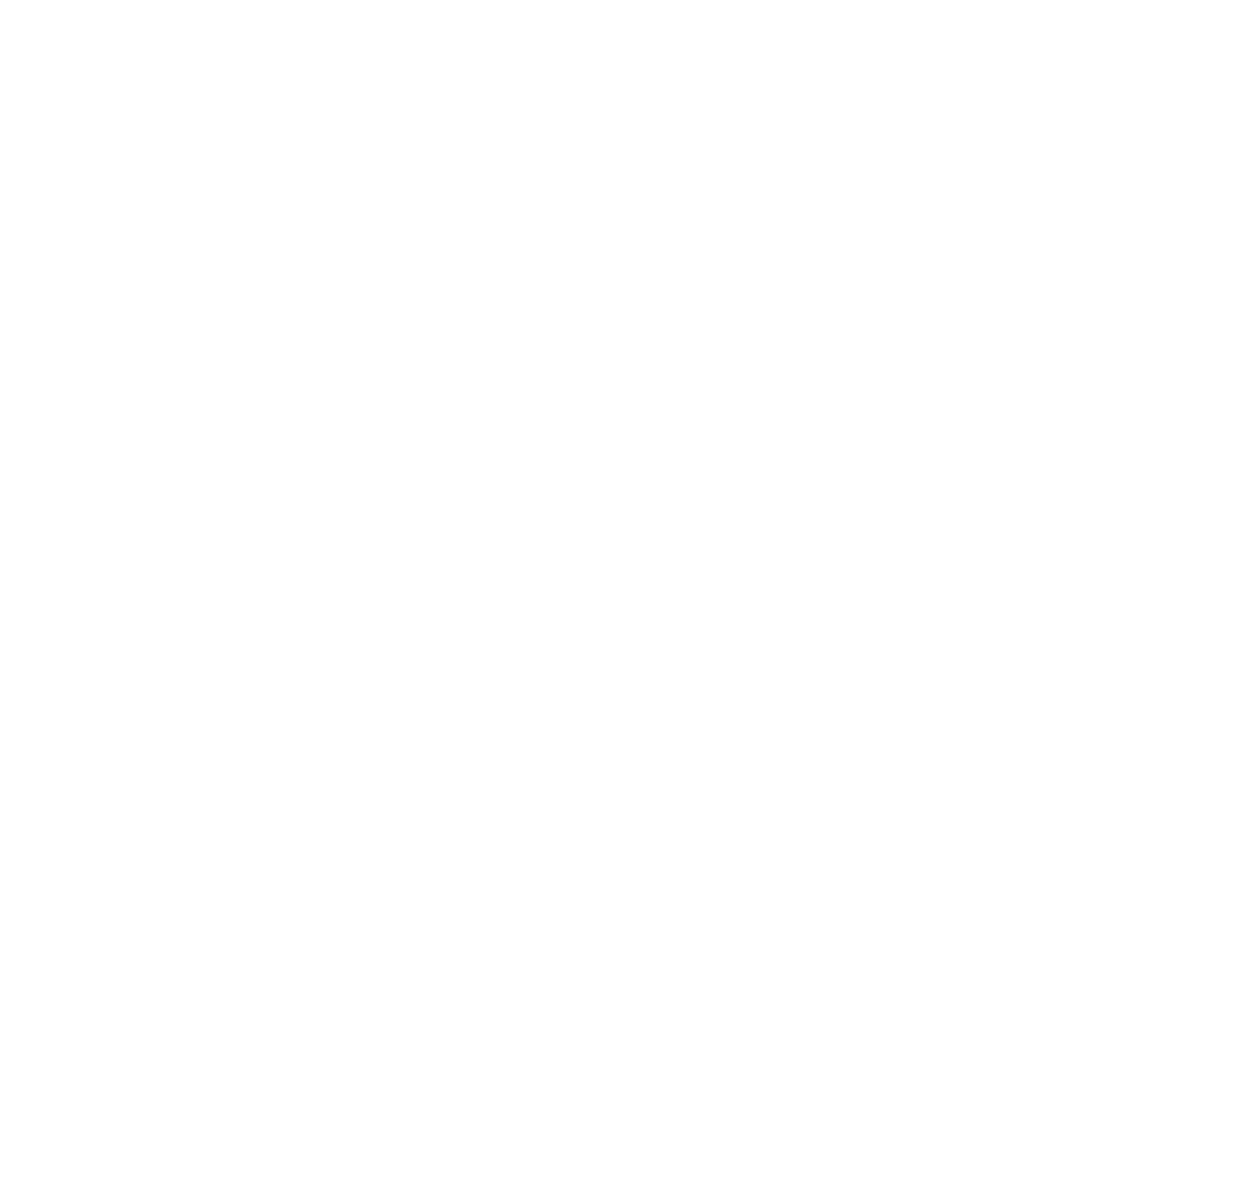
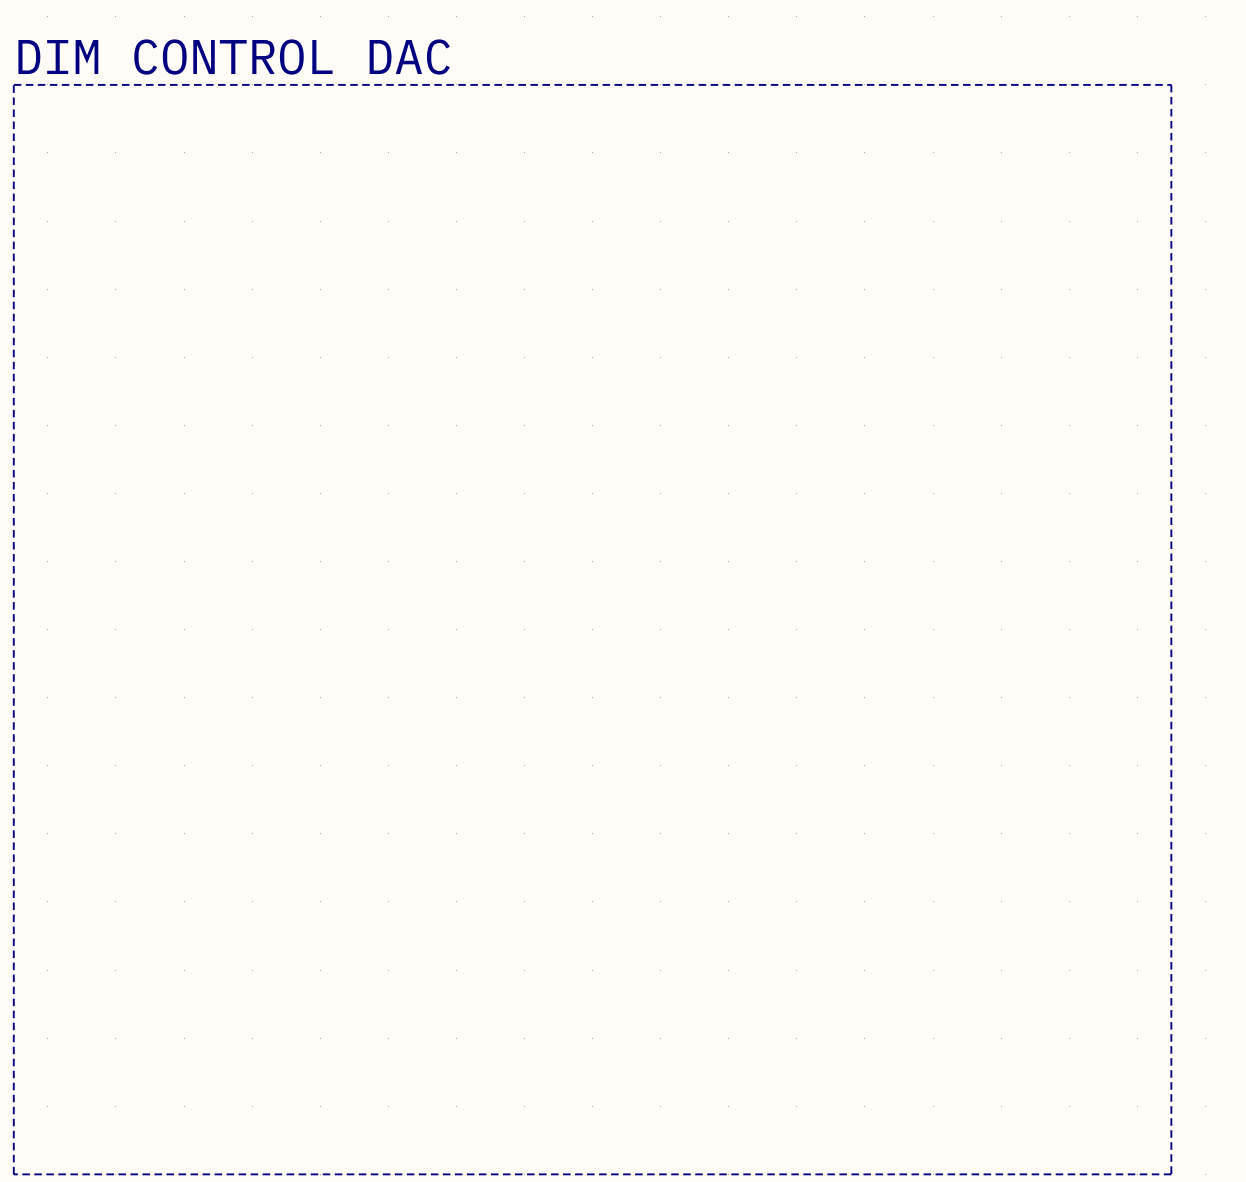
text: none -> DIM CONTROL DAC (234, 57)
line: none -> (13, 84) (1171, 84) (1171, 1174) (13, 1174) (13, 84)

